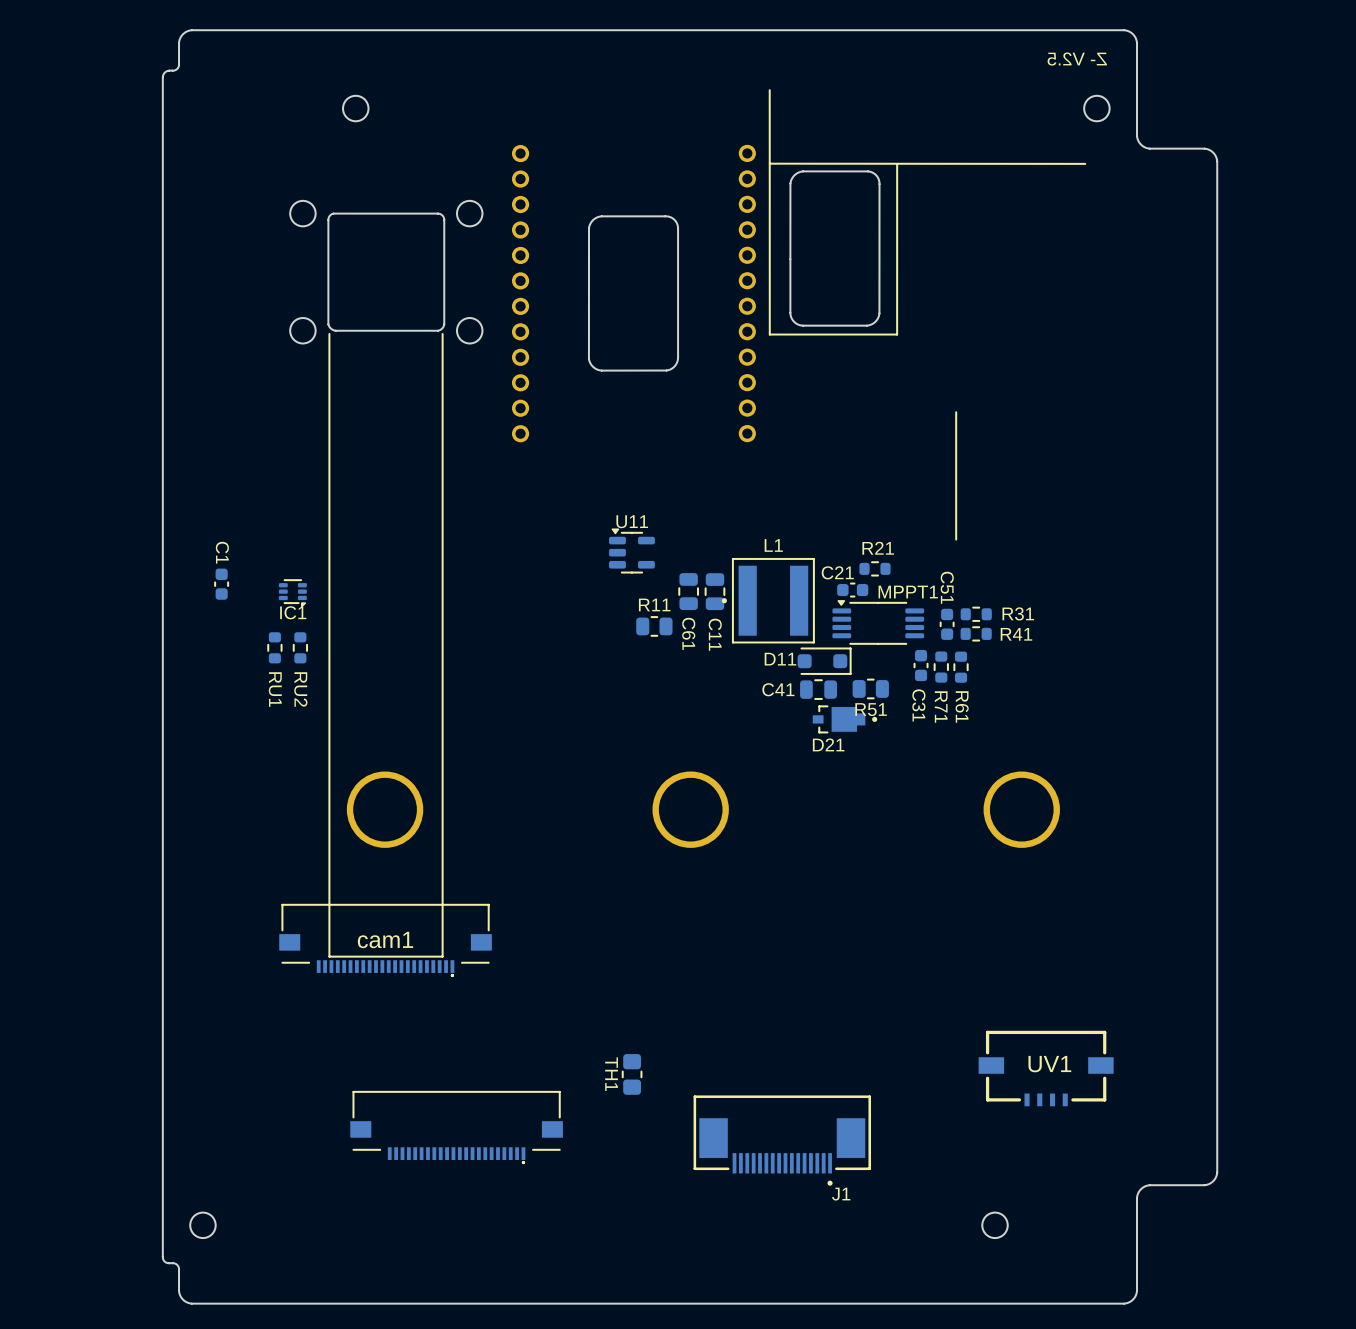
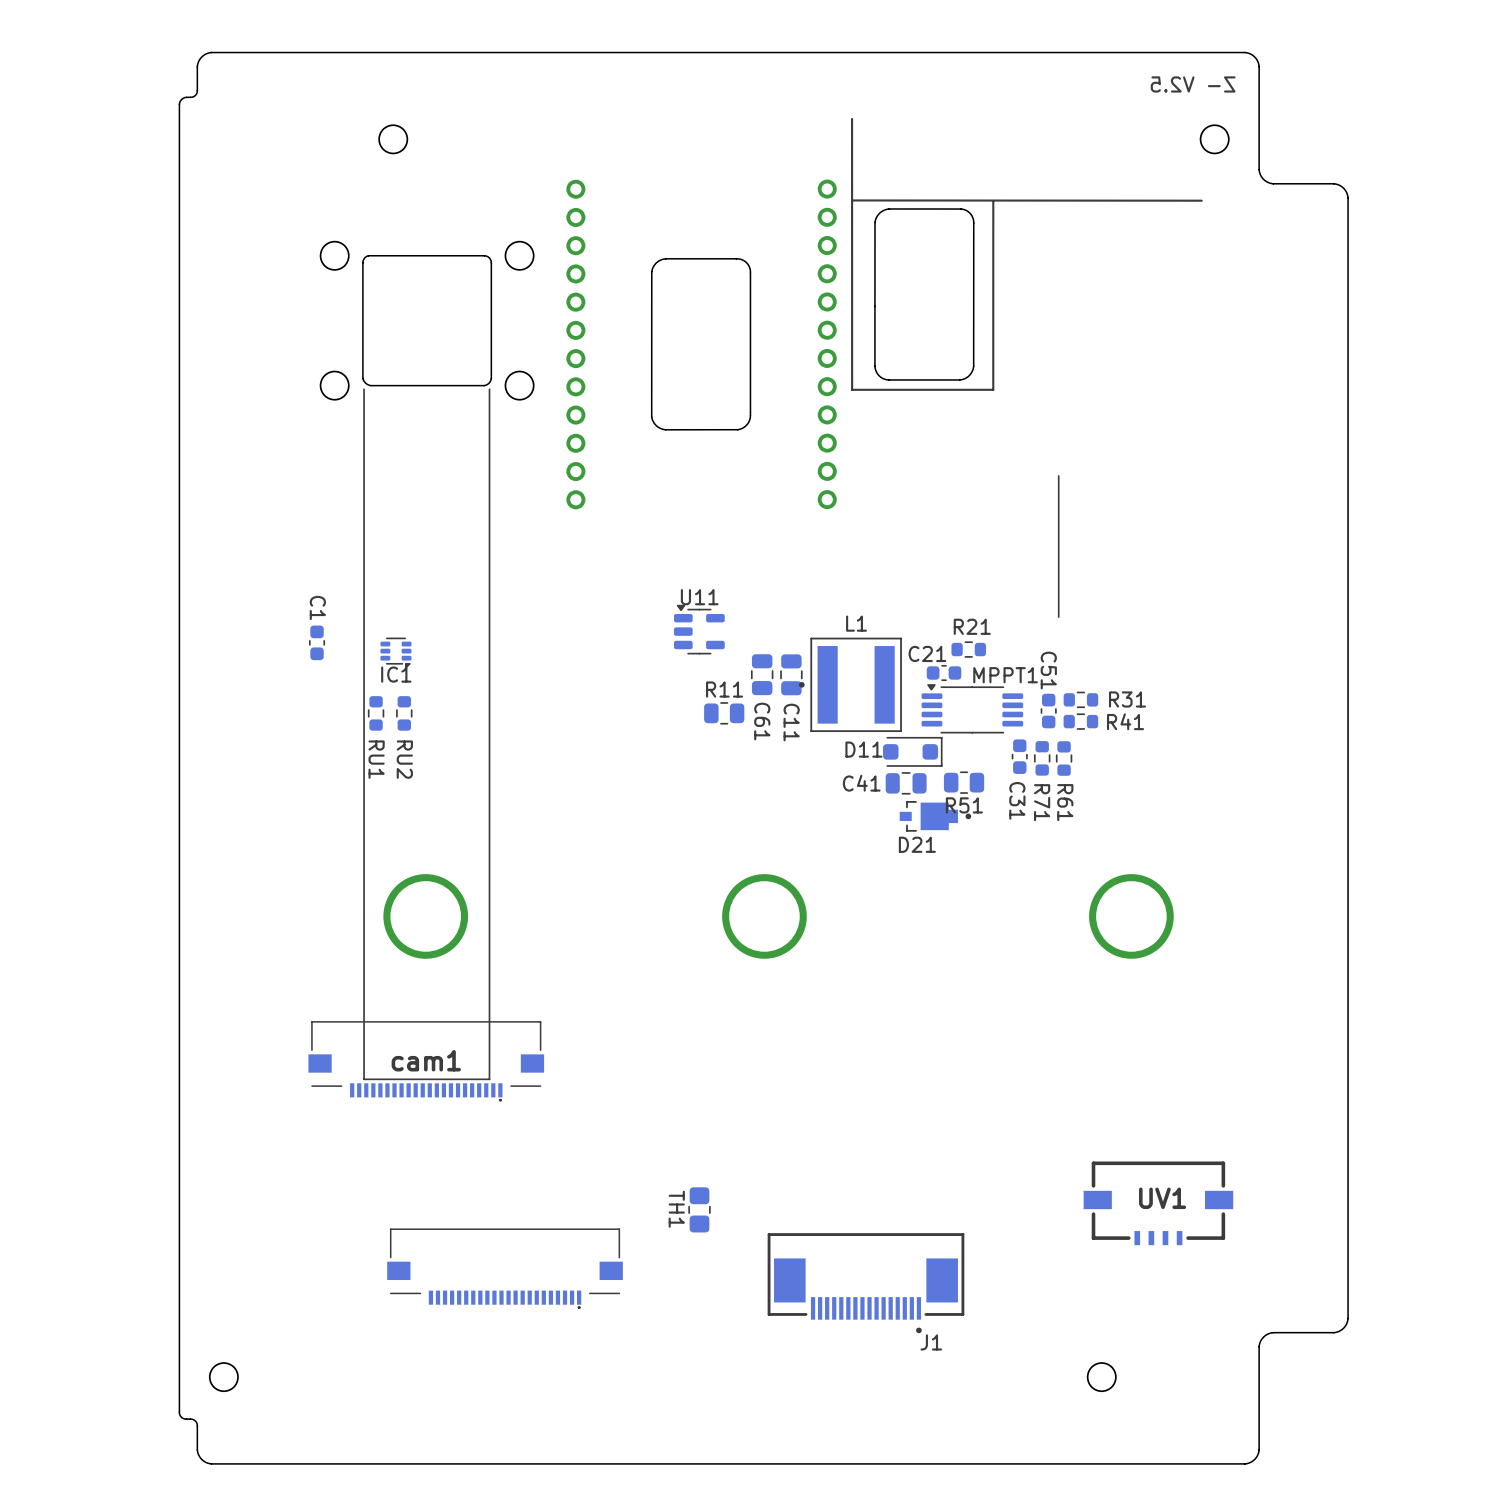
C1 position: (221, 584) -> (317, 642)
IC1 position: (292, 593) -> (395, 653)
RU1 position: (274, 647) -> (376, 713)
RU2 position: (300, 647) -> (404, 713)

